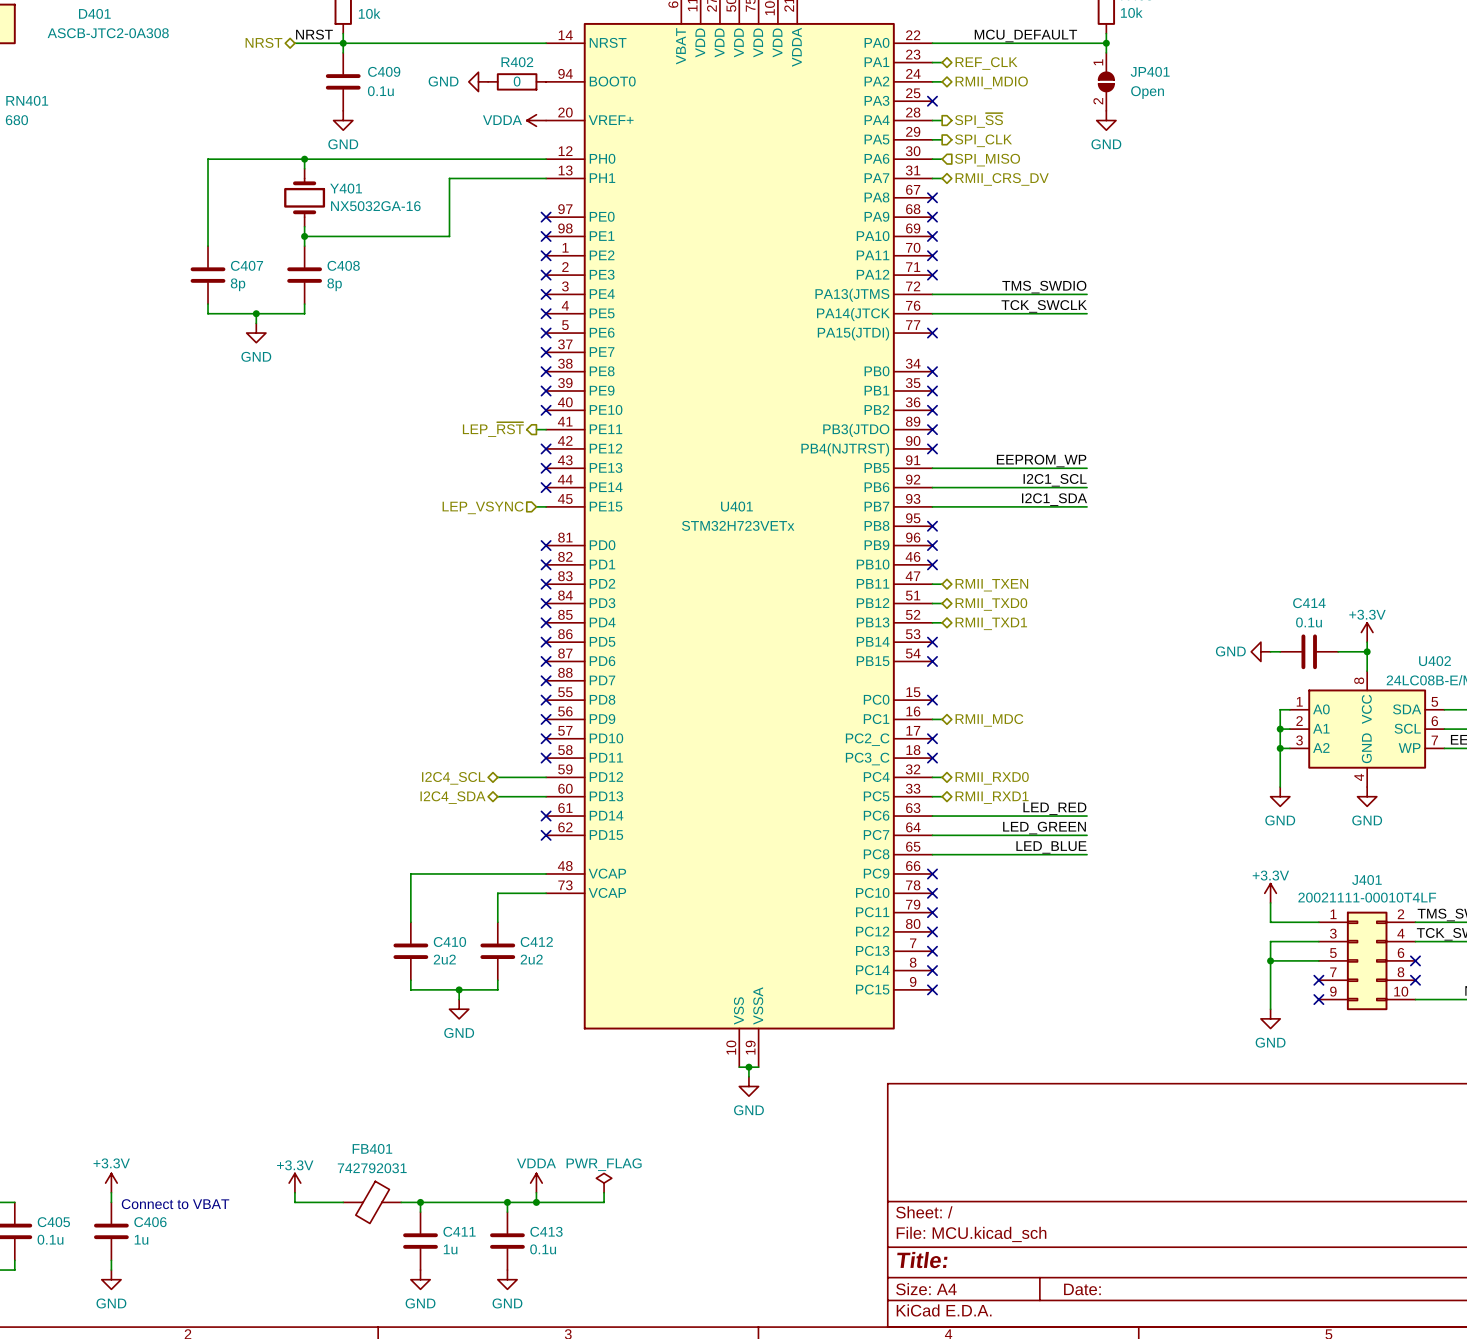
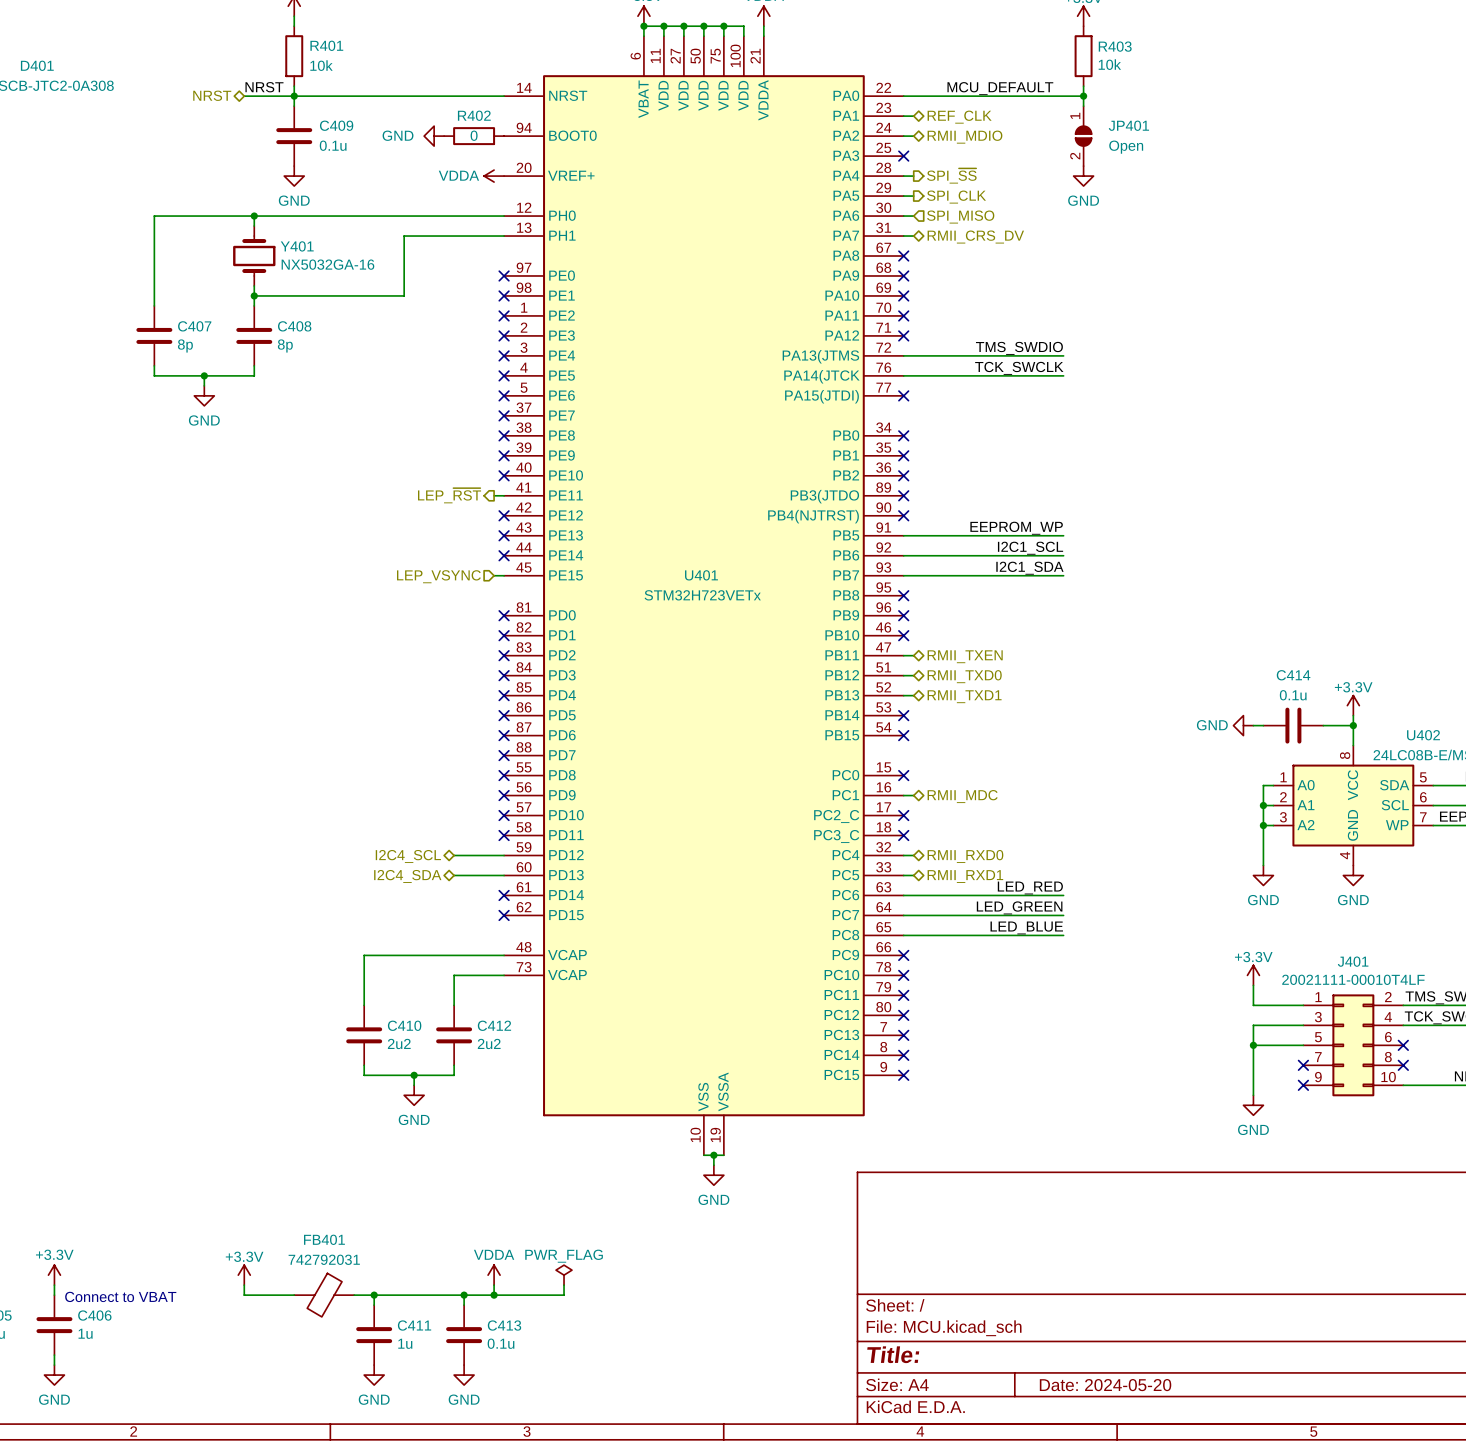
title block: Date: (1082, 1289) -> Date: 2024-05-20 (1105, 1385)

